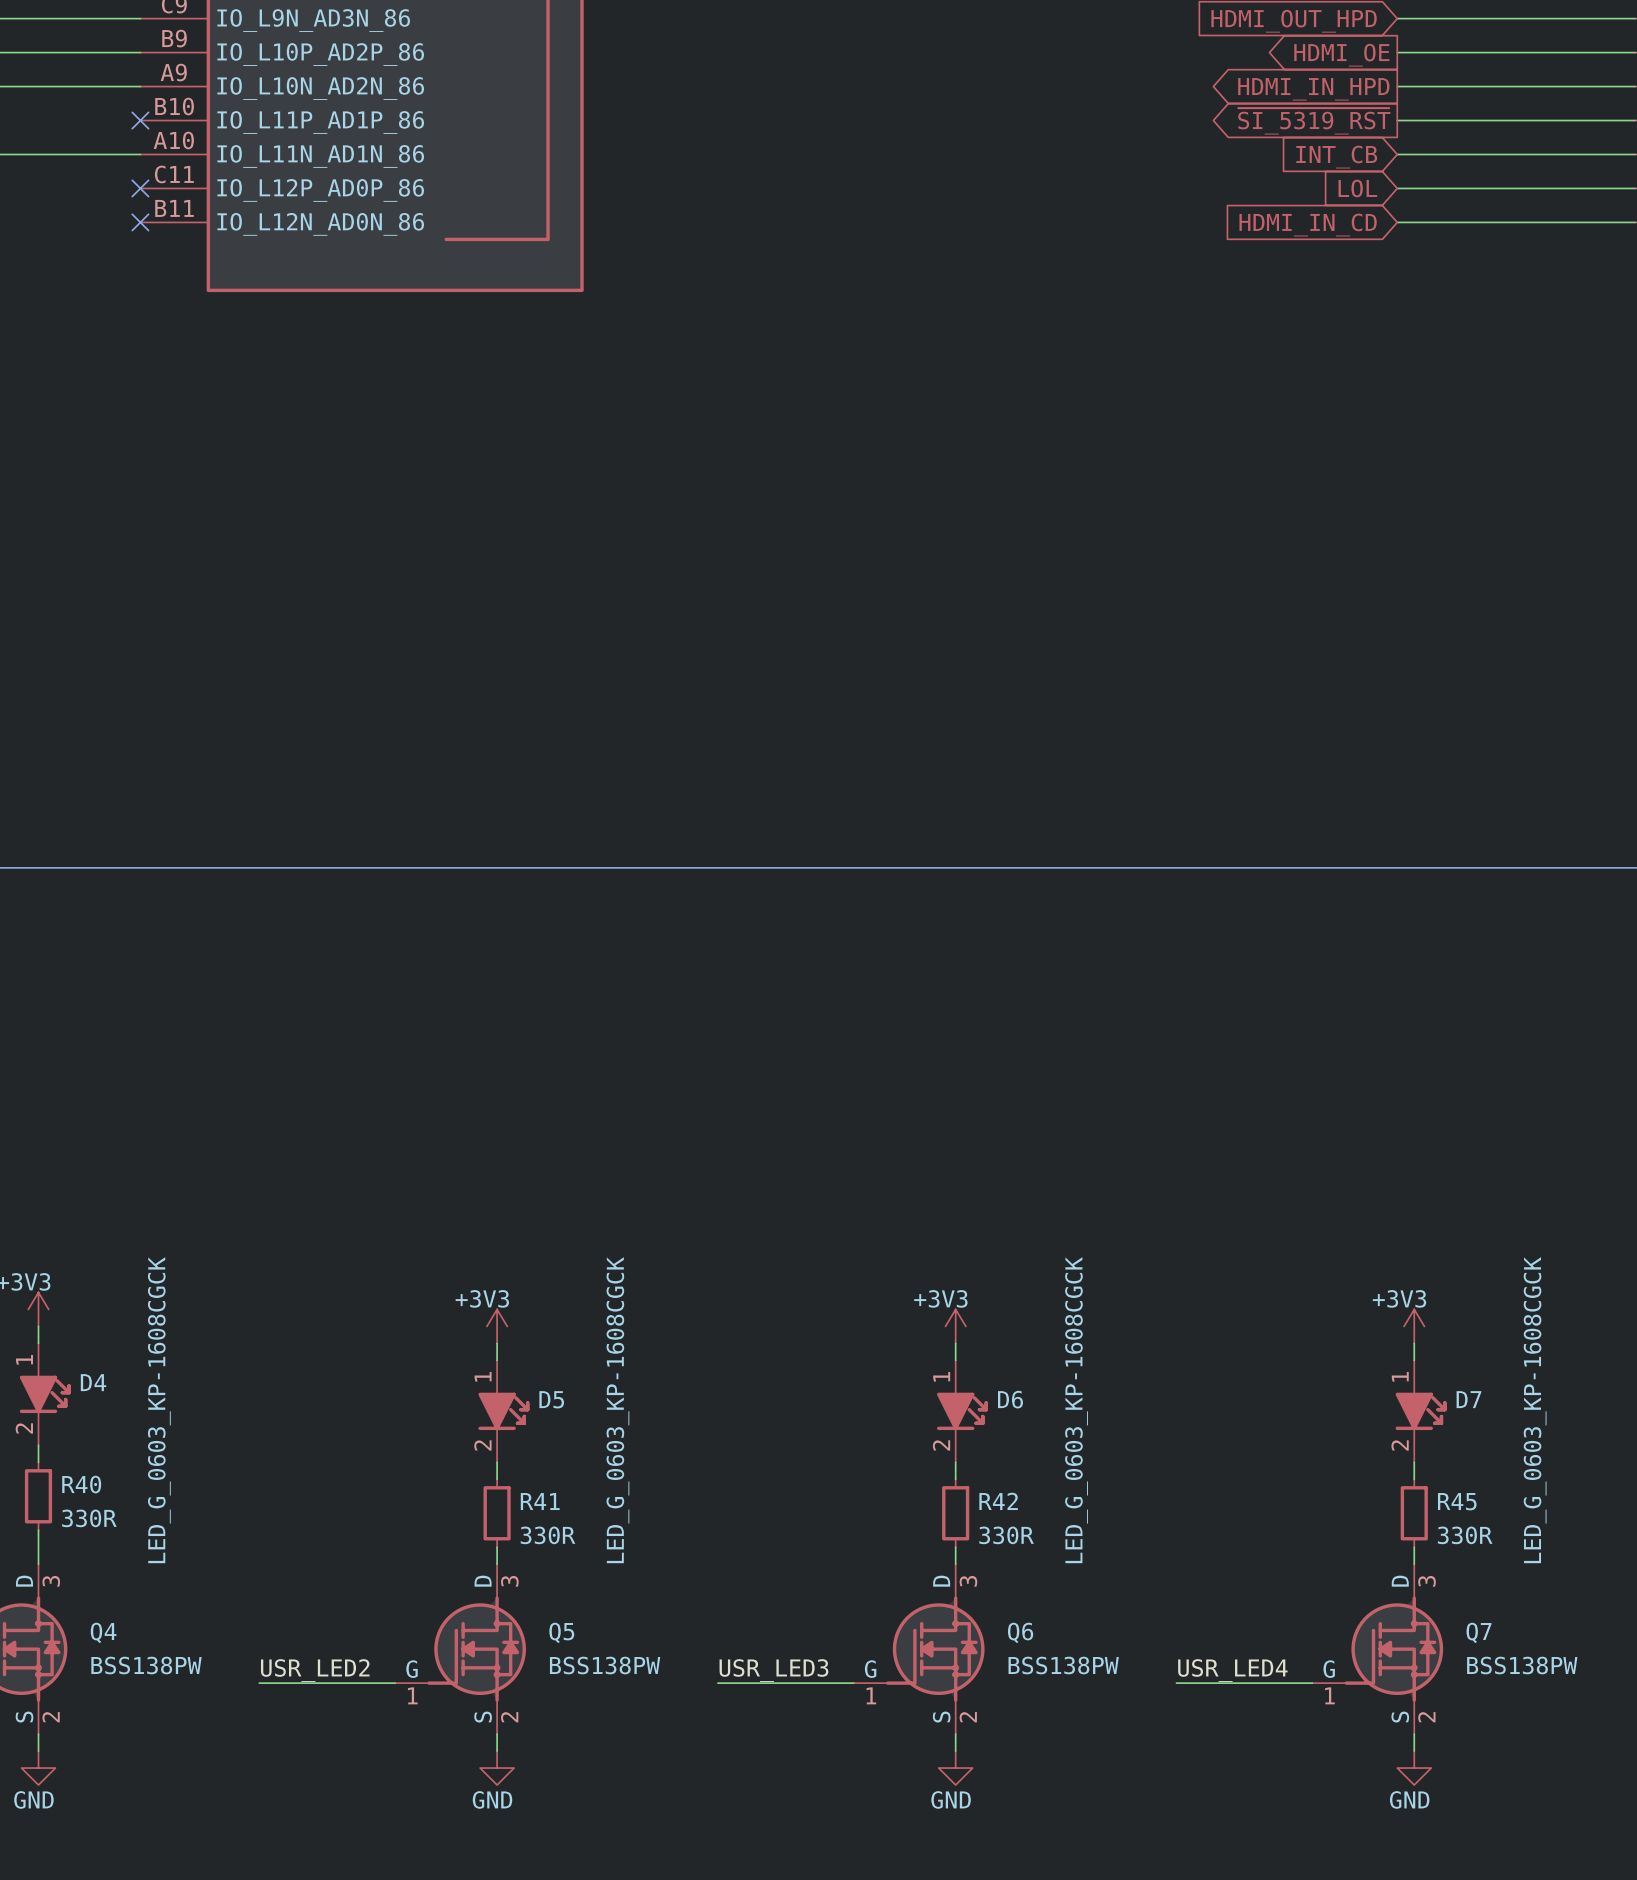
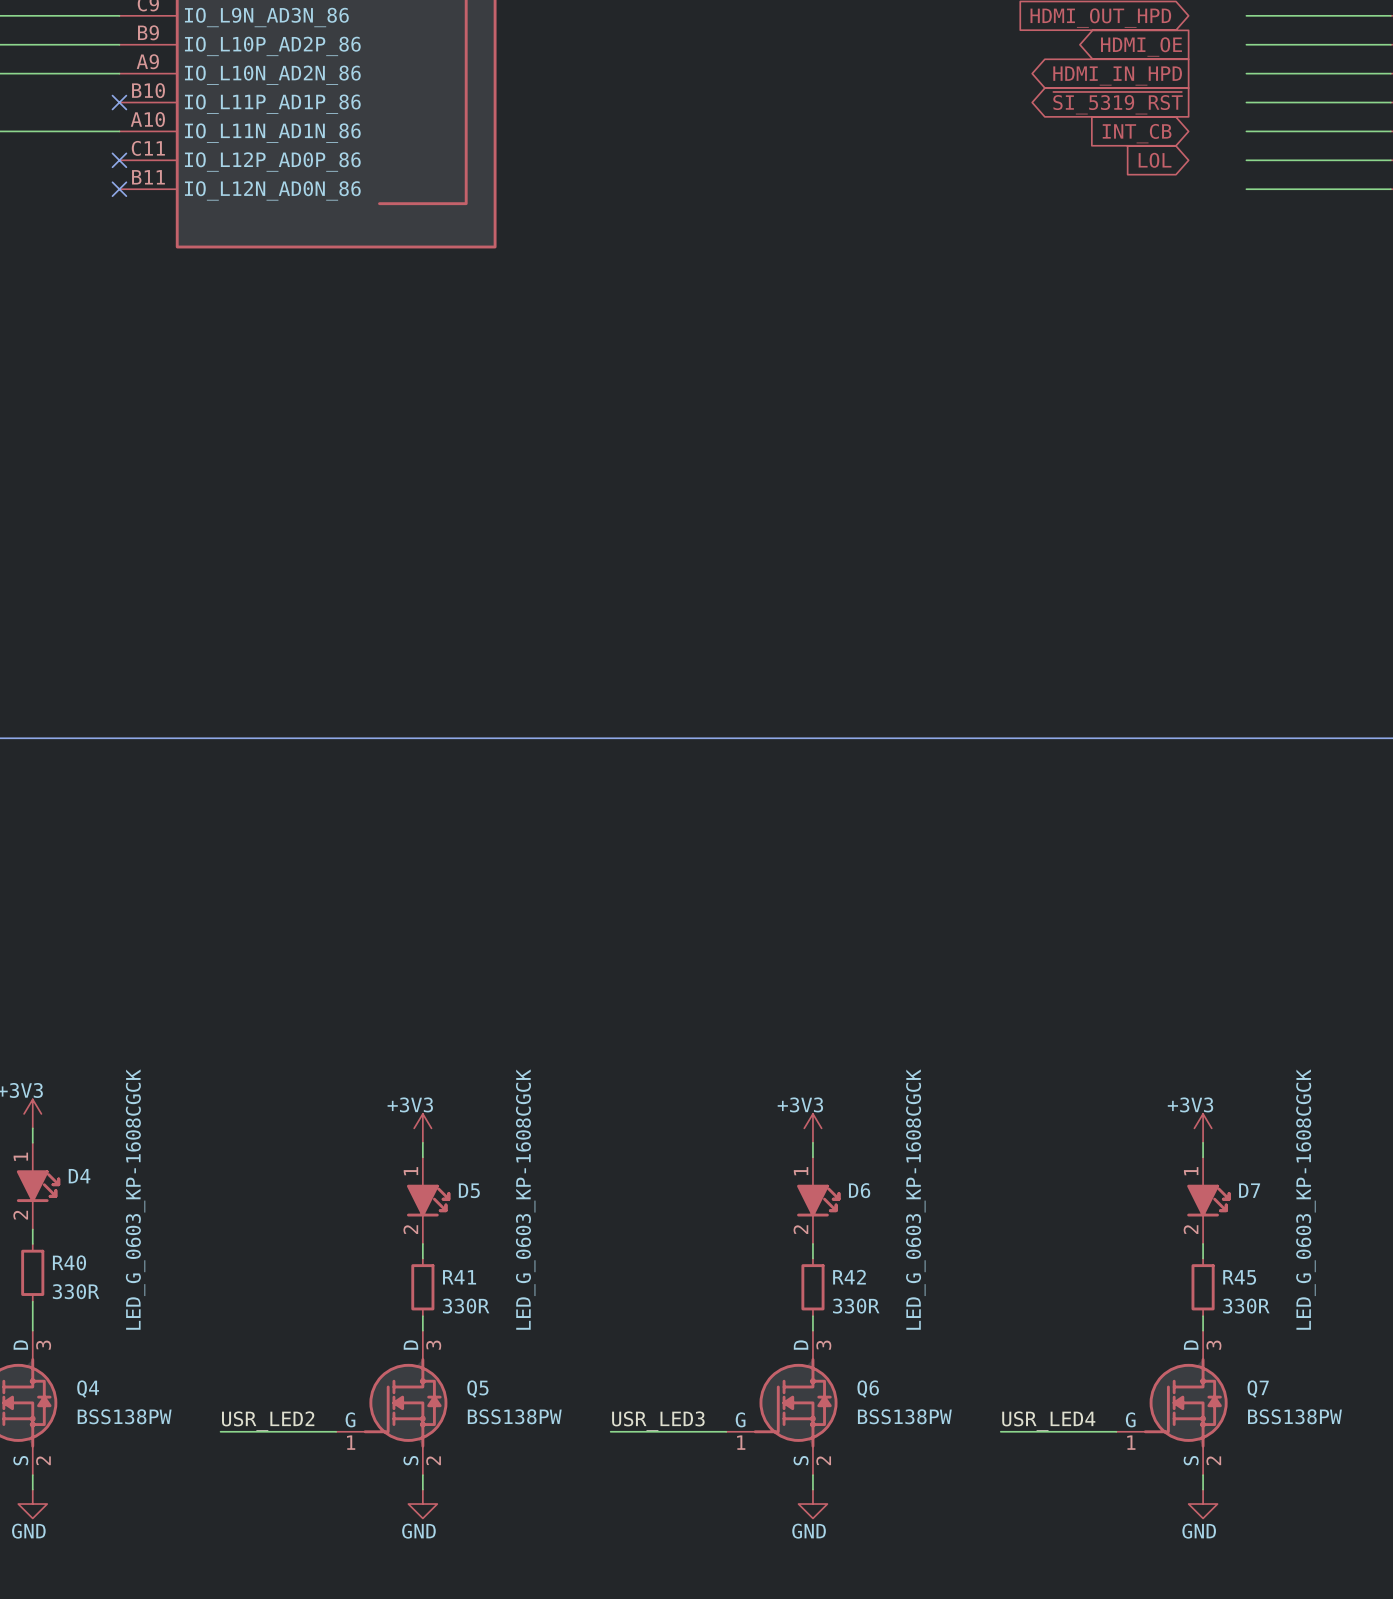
wire: (1397, 18) (1465, 18) -> none
wire: (1397, 52) (1465, 52) -> none
wire: (1397, 86) (1465, 86) -> none
wire: (1397, 120) (1465, 120) -> none
wire: (1397, 154) (1465, 154) -> none
wire: (1397, 188) (1465, 188) -> none
wire: (1397, 222) (1465, 222) -> none
global label: HDMI_IN_CD (1308, 225) -> none

